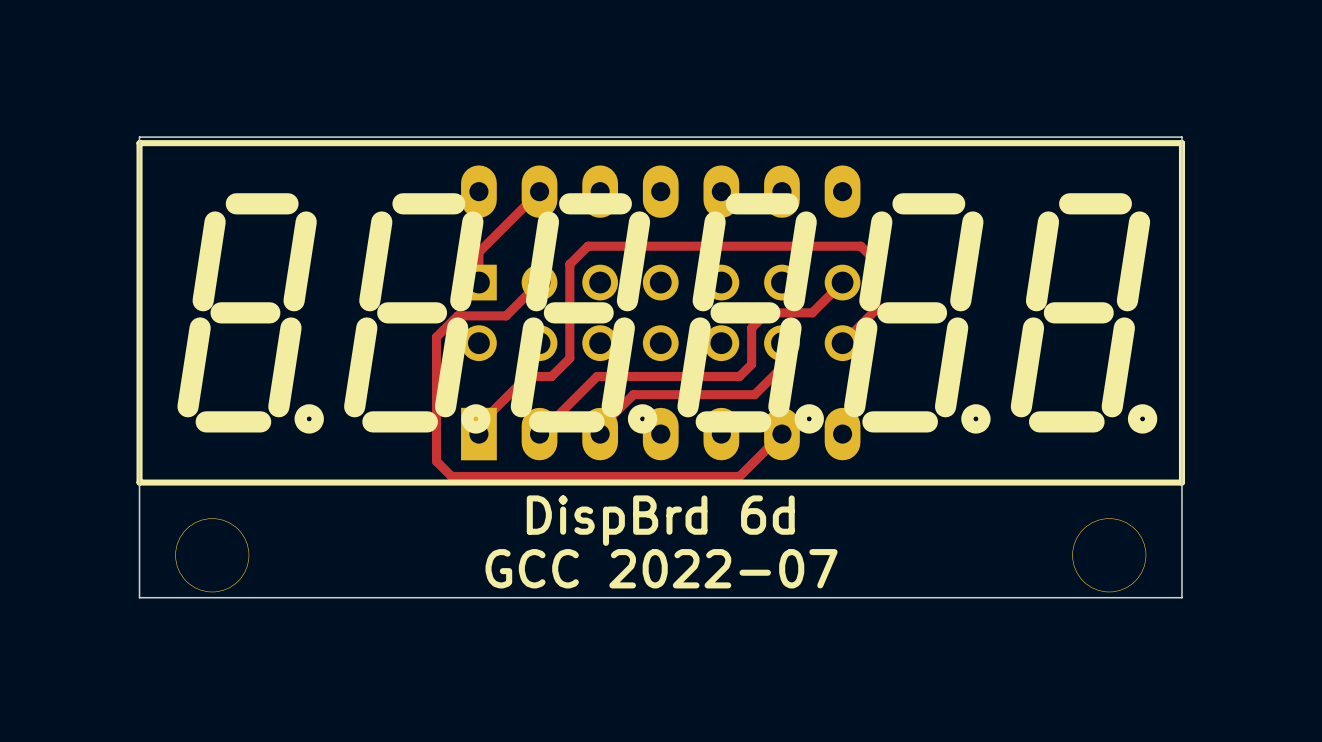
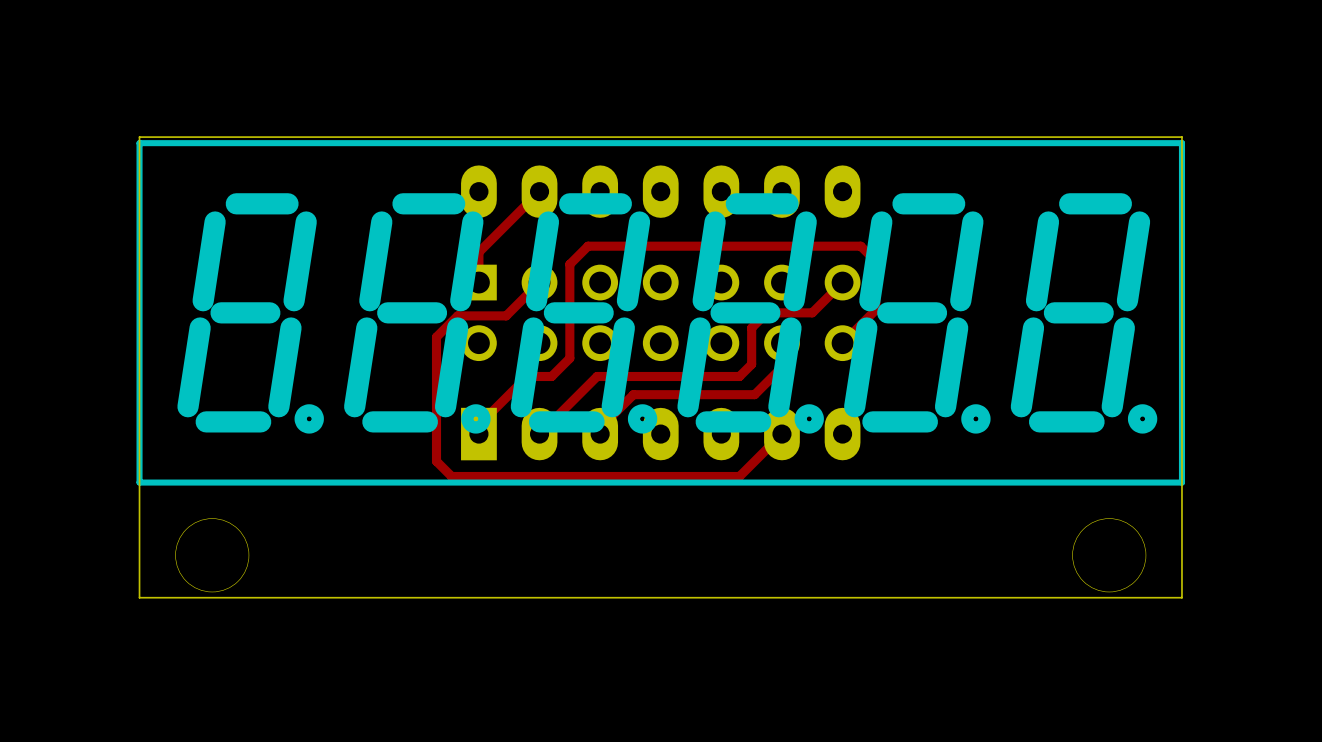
text: DispBrd 6d (660, 520) -> none
text: GCC 2022-07 (661, 568) -> none

